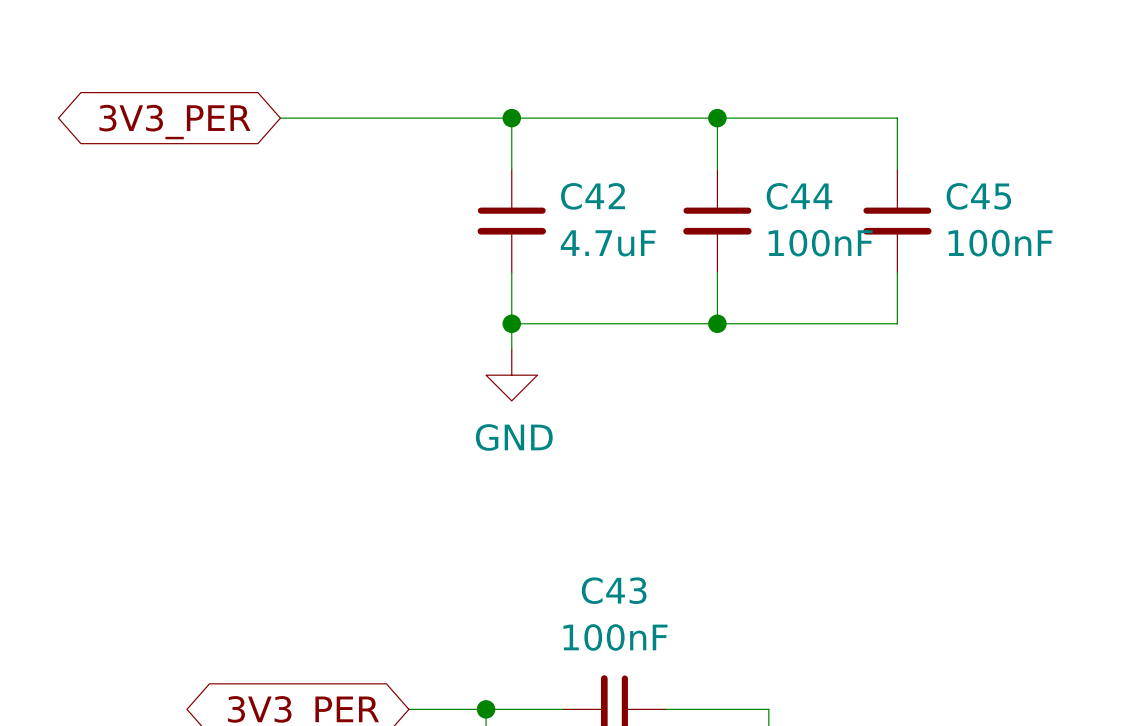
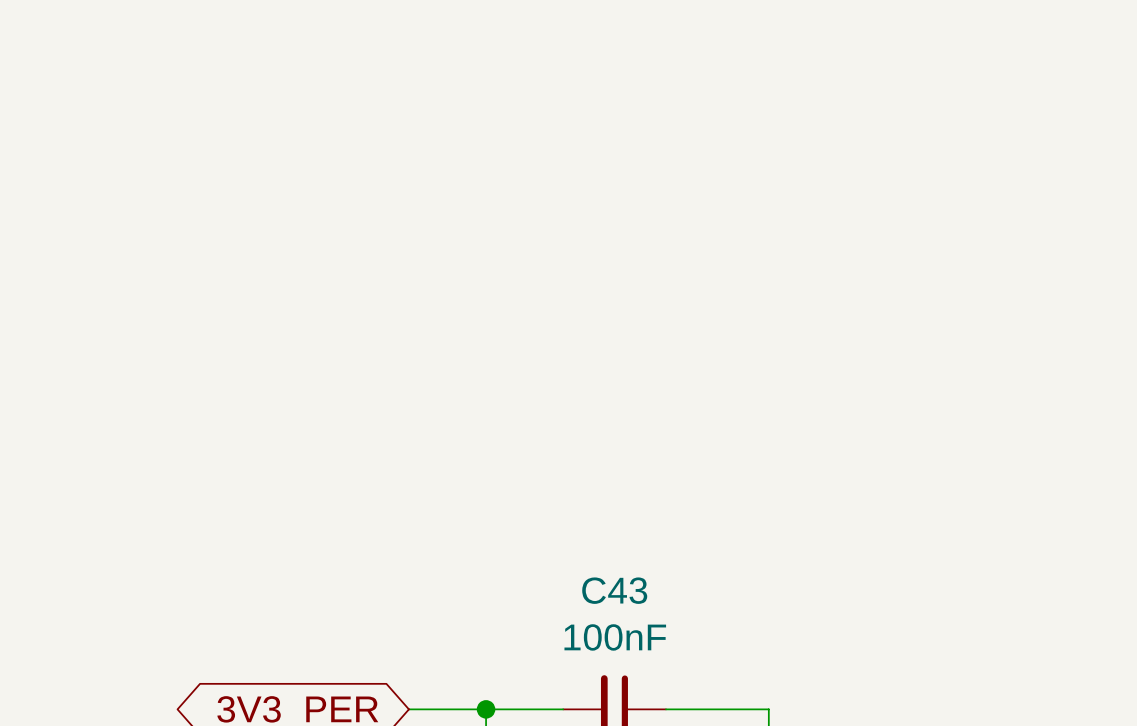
wire: (280, 118) (897, 118) (897, 169) -> none
wire: (511, 118) (511, 169) -> none
junction: (511, 118) -> none
wire: (717, 118) (717, 169) -> none
junction: (717, 118) -> none
global label: 3V3_PER (174, 122) -> none
C42: 4.7uF (511, 220) -> none
C44: 100nF (717, 220) -> none
C45: 100nF (897, 220) -> none
wire: (511, 272) (511, 349) -> none
wire: (717, 272) (717, 323) -> none
wire: (897, 272) (897, 323) (511, 323) -> none
junction: (511, 323) -> none
junction: (717, 323) -> none
power symbol: GND (511, 375) -> none

